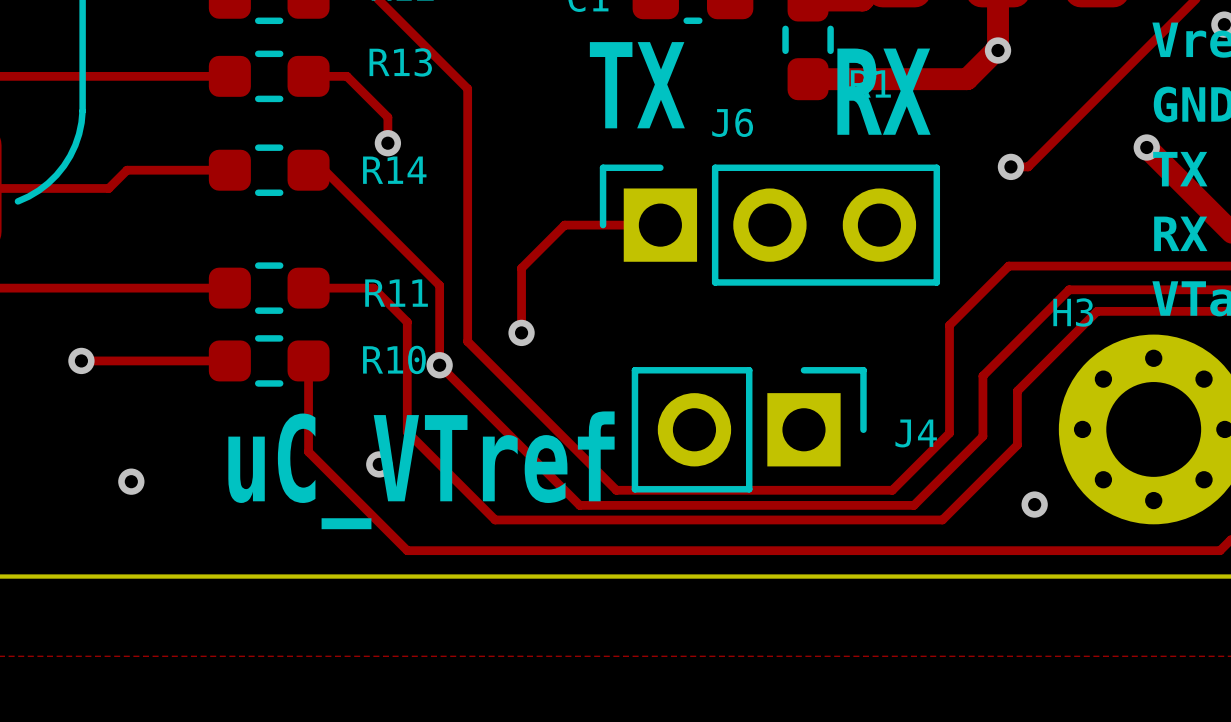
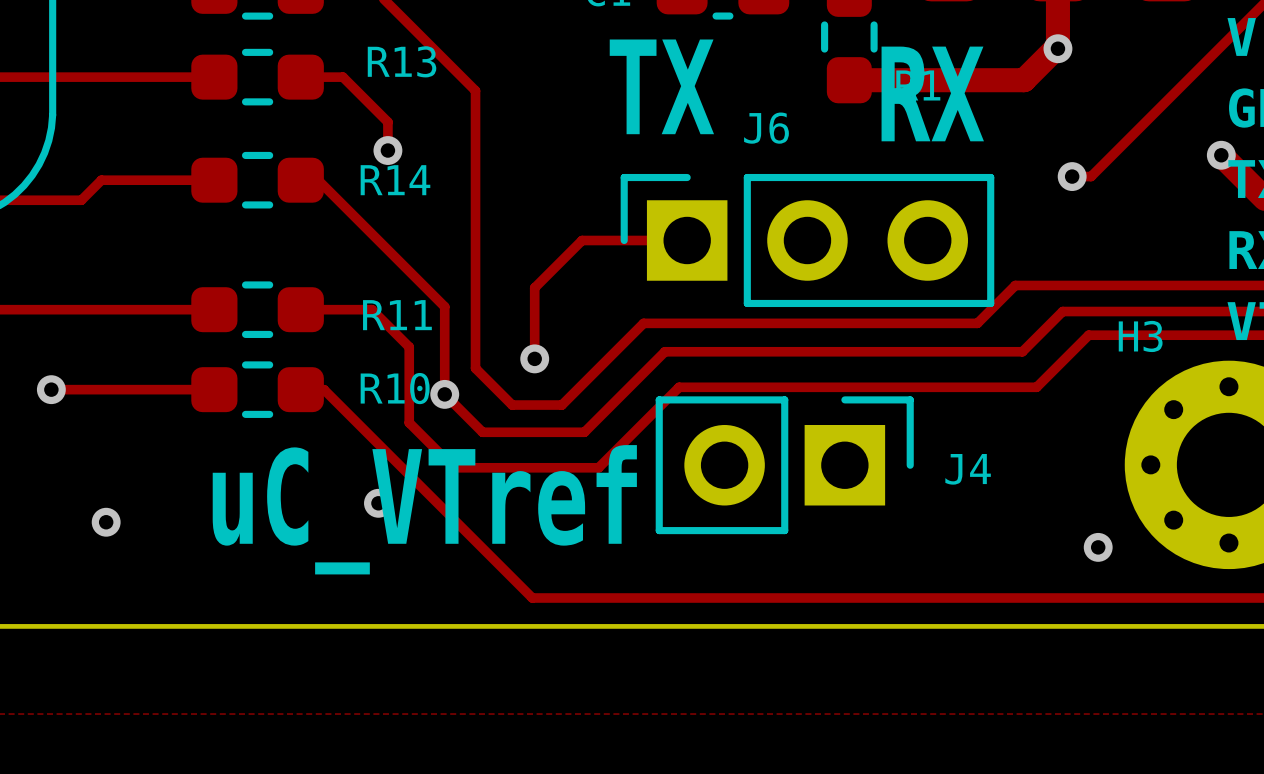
track: (1008, 266) (949, 325) (949, 433) (892, 490) (616, 490) (501, 374) -> (1069, 285) (1015, 285) (977, 323) (643, 323) (561, 405) (512, 405)
track: (1069, 289) (982, 376) (982, 436) (913, 505) (579, 505) (474, 399) -> (1136, 311) (1062, 311) (1022, 351) (664, 351) (584, 432) (482, 432)
track: (1097, 311) (1017, 391) (1017, 445) (942, 519) (495, 519) (407, 432) (407, 391) -> (1166, 335) (1088, 335) (1036, 387) (679, 387) (598, 467) (454, 467) (409, 422)
track: (308, 360) (308, 451) (407, 550) (519, 550) -> (300, 389) (324, 389) (532, 598)

